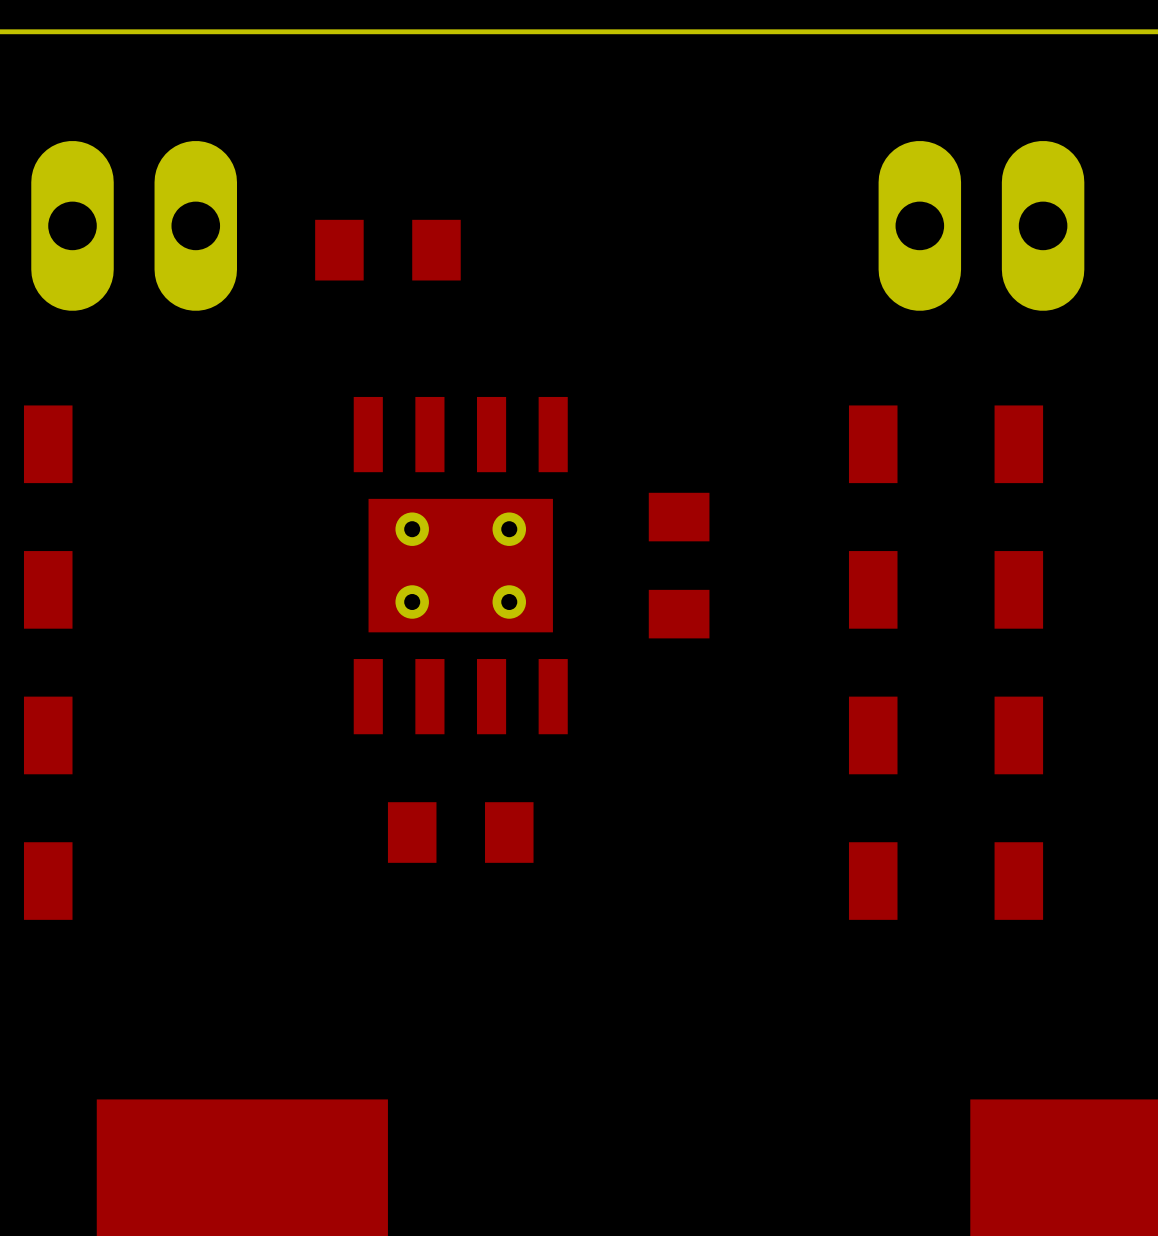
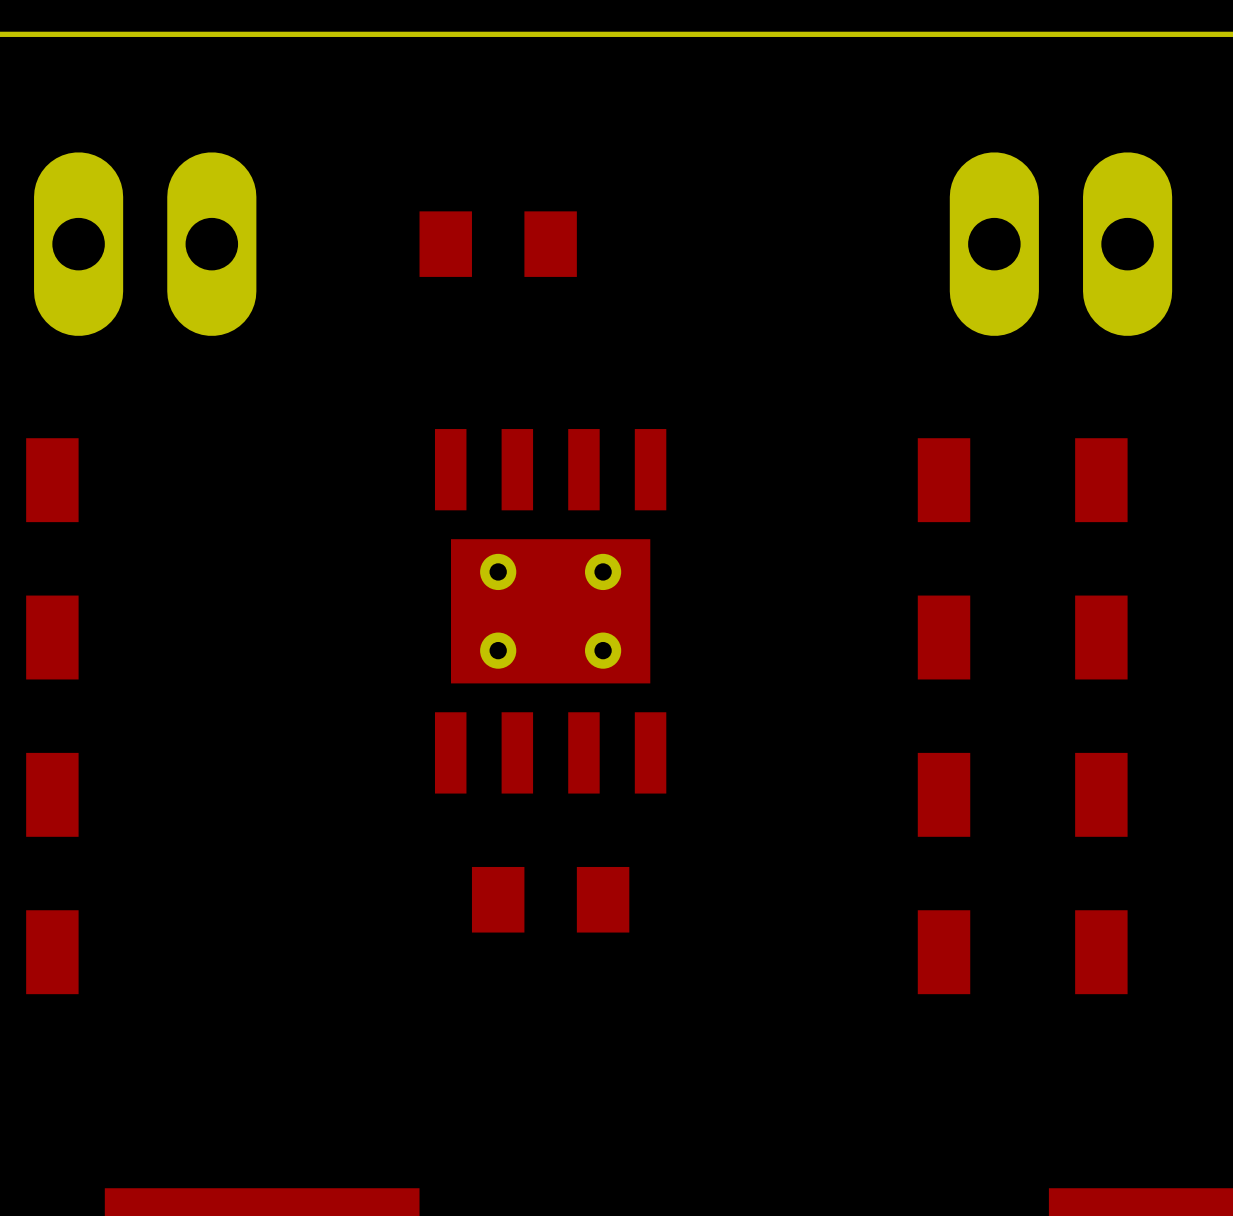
part position: (387, 250) -> (498, 244)
part position: (460, 565) -> (550, 611)
part: (679, 565) -> none
part position: (460, 832) -> (550, 899)

